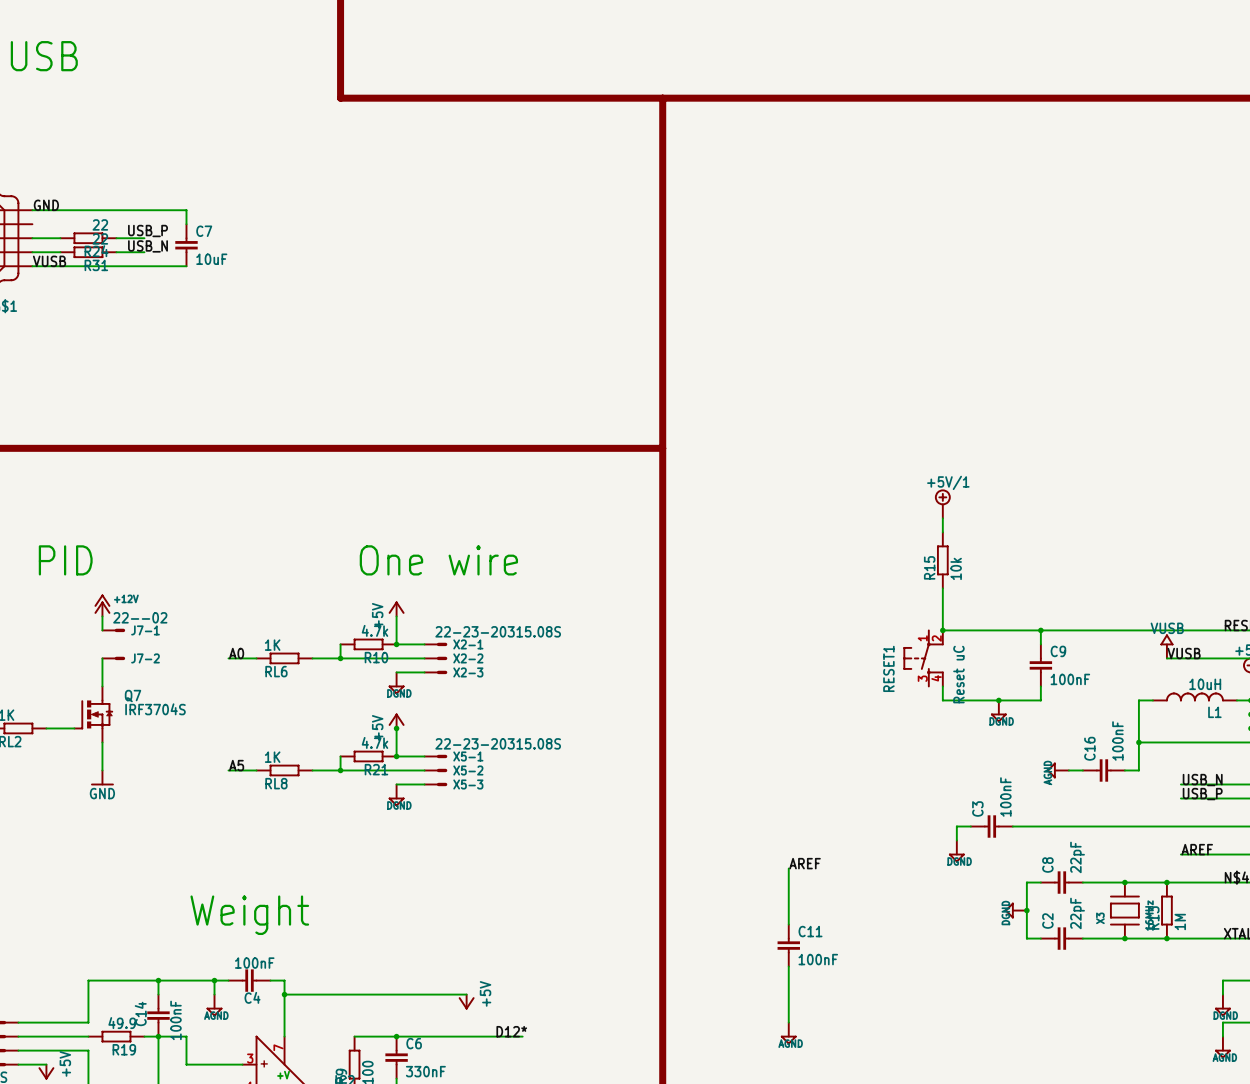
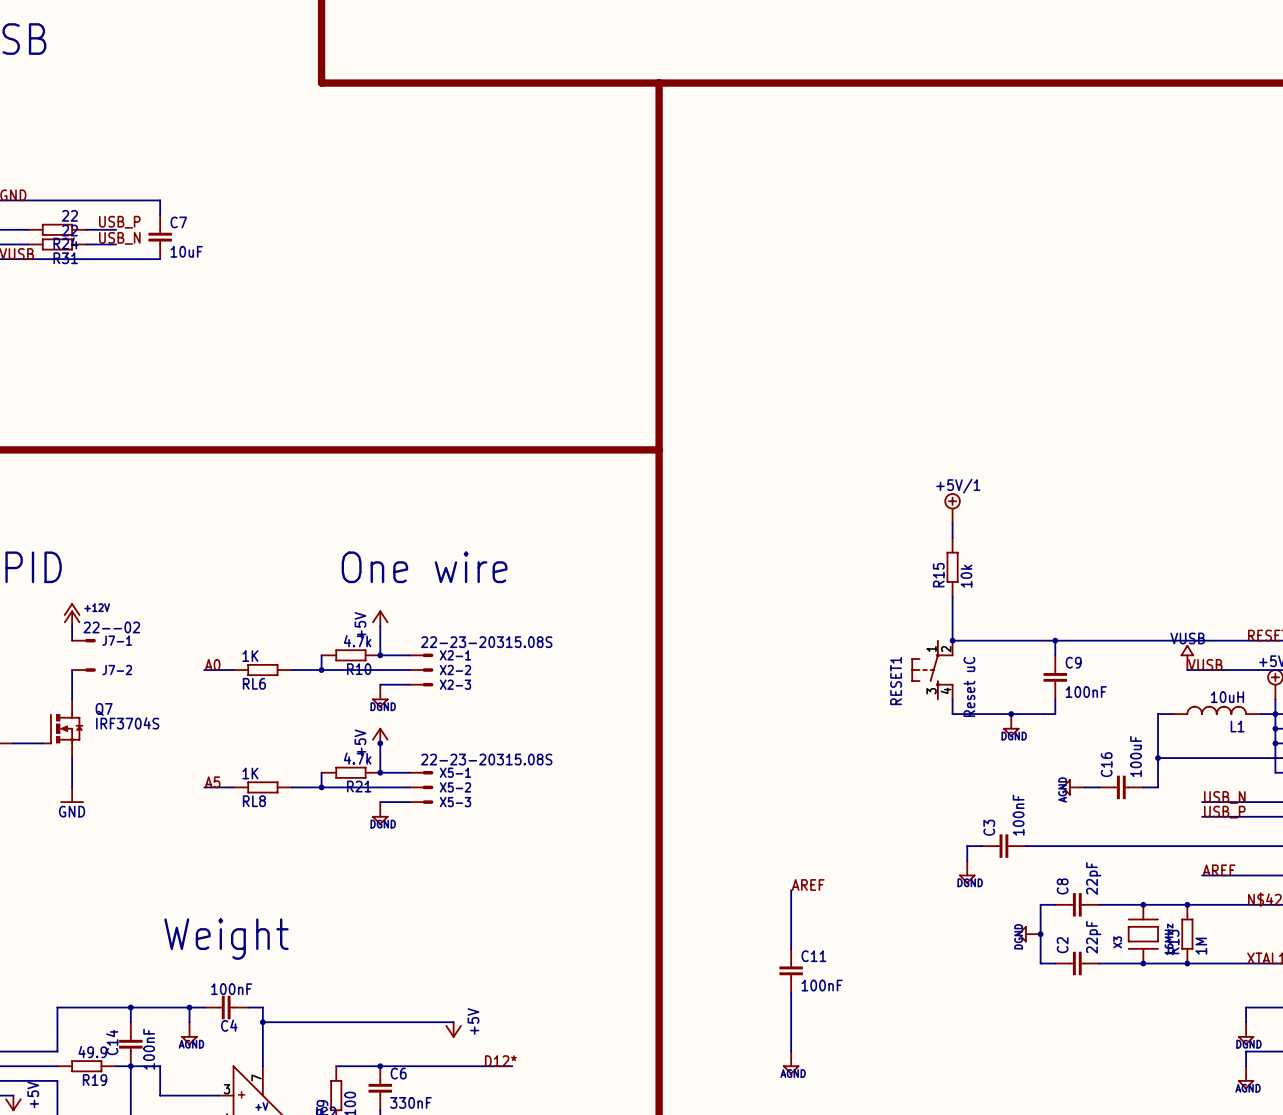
C16 value: 100nF (1117, 740) -> 100uF (1136, 756)

